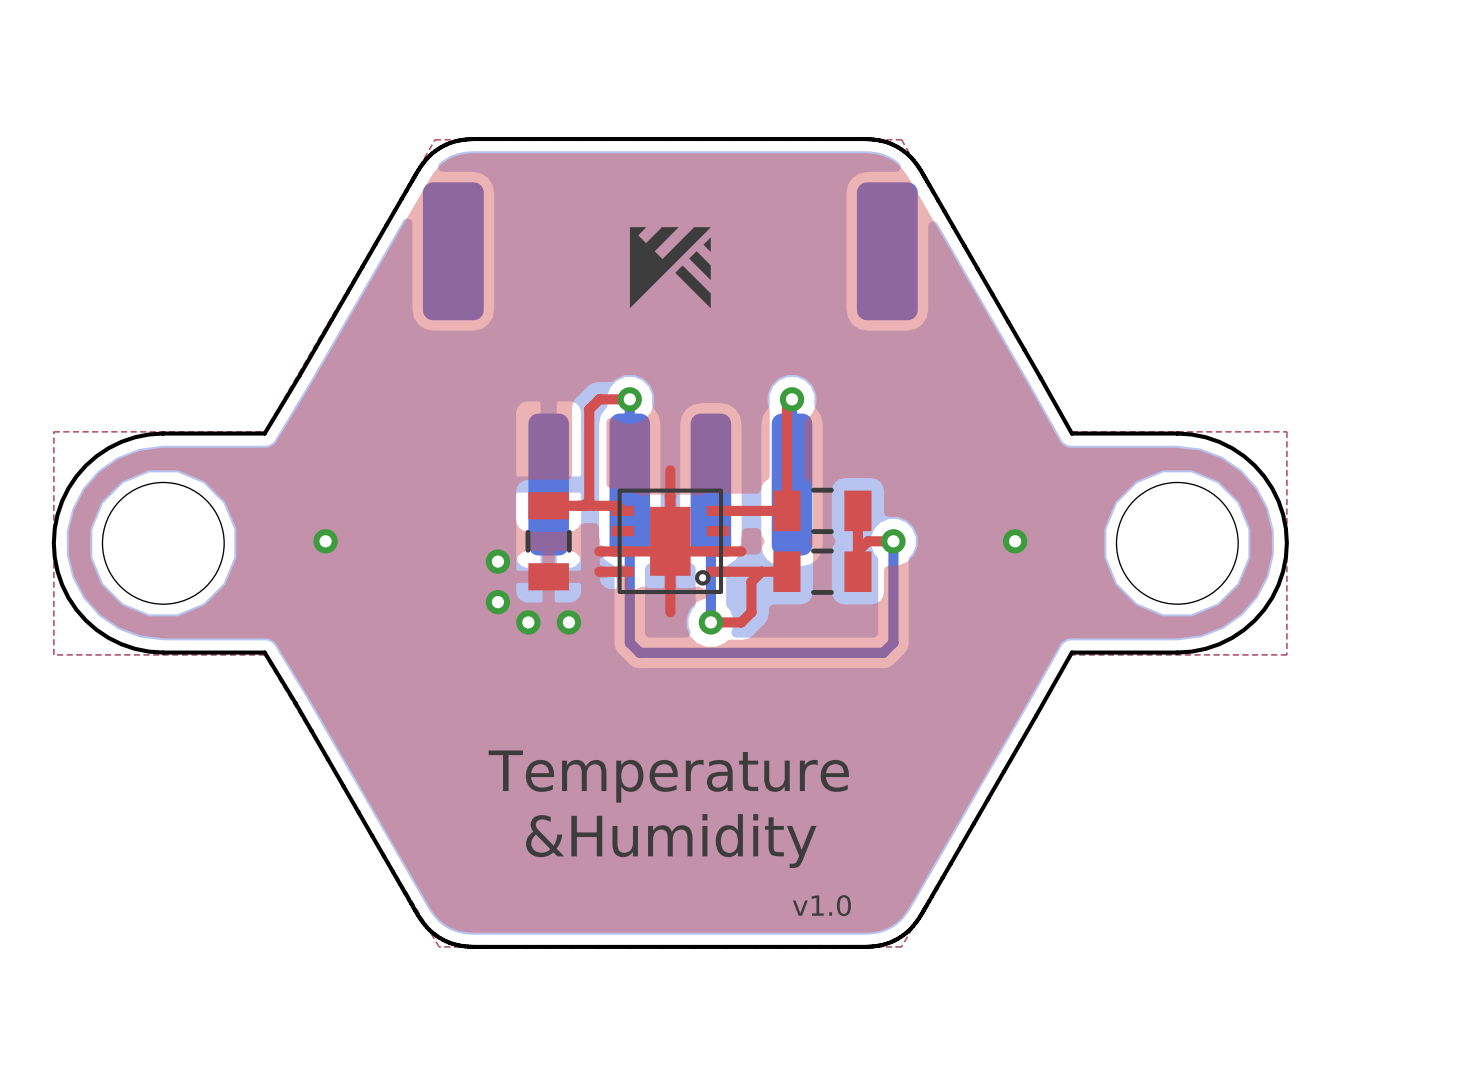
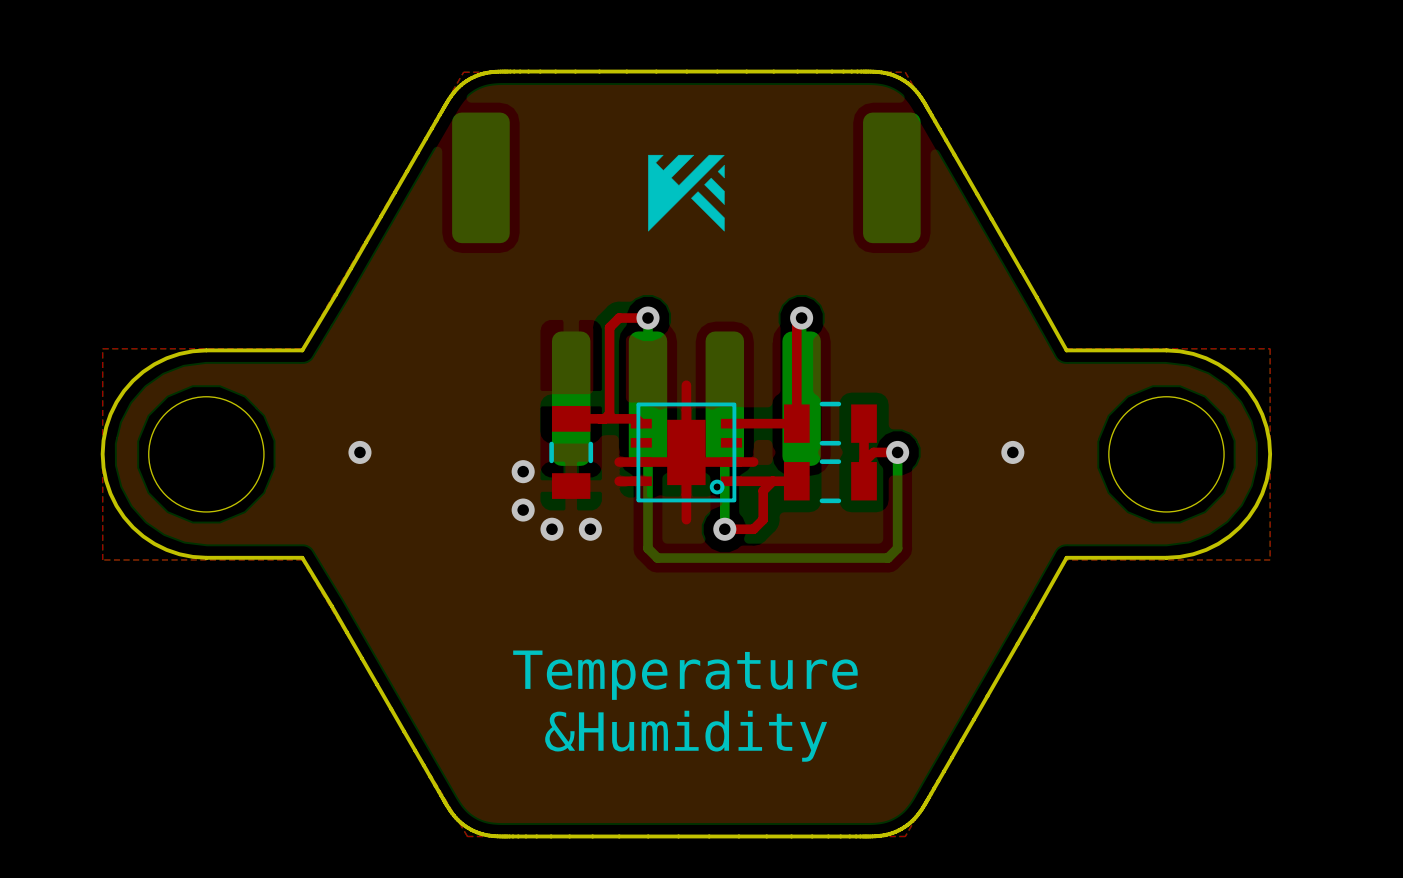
text: v1.0 (821, 905) -> none

